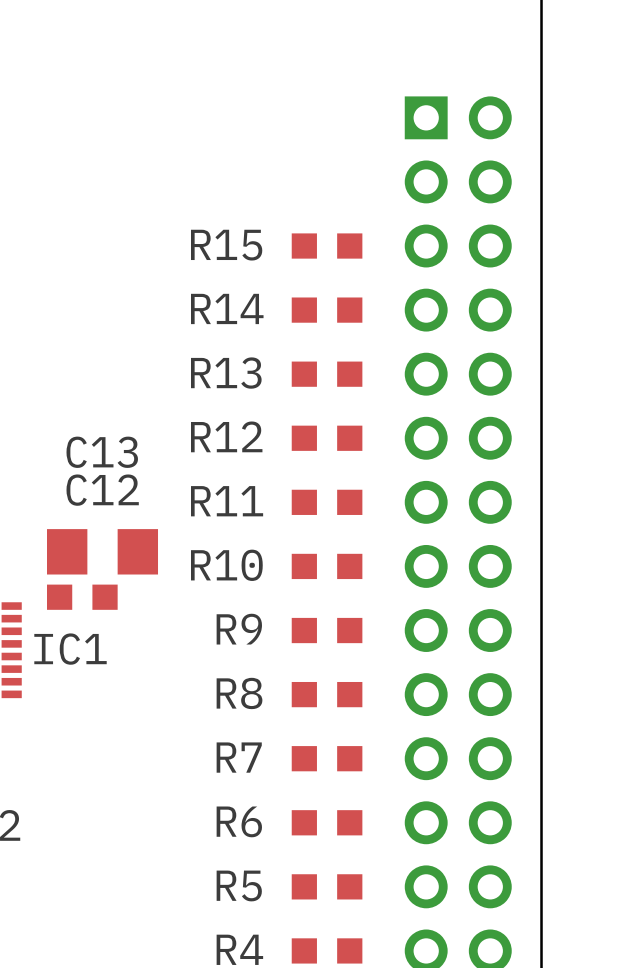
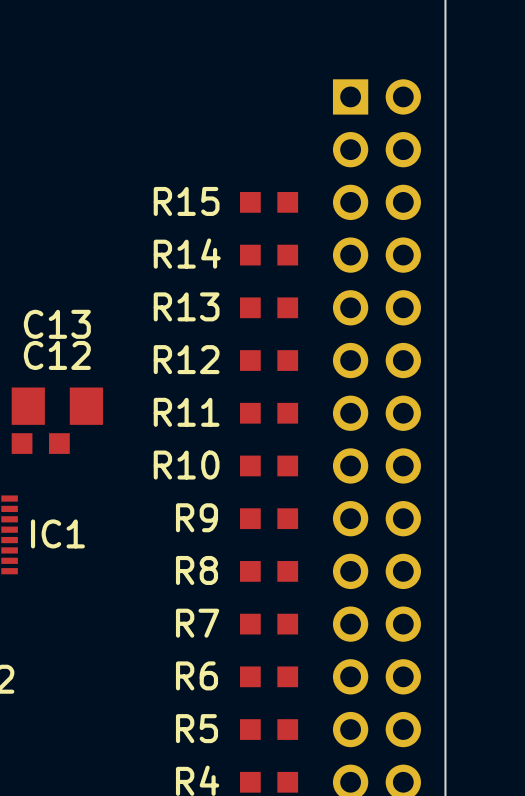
C13 position: (102, 551) -> (57, 406)
C12 position: (82, 597) -> (40, 443)

